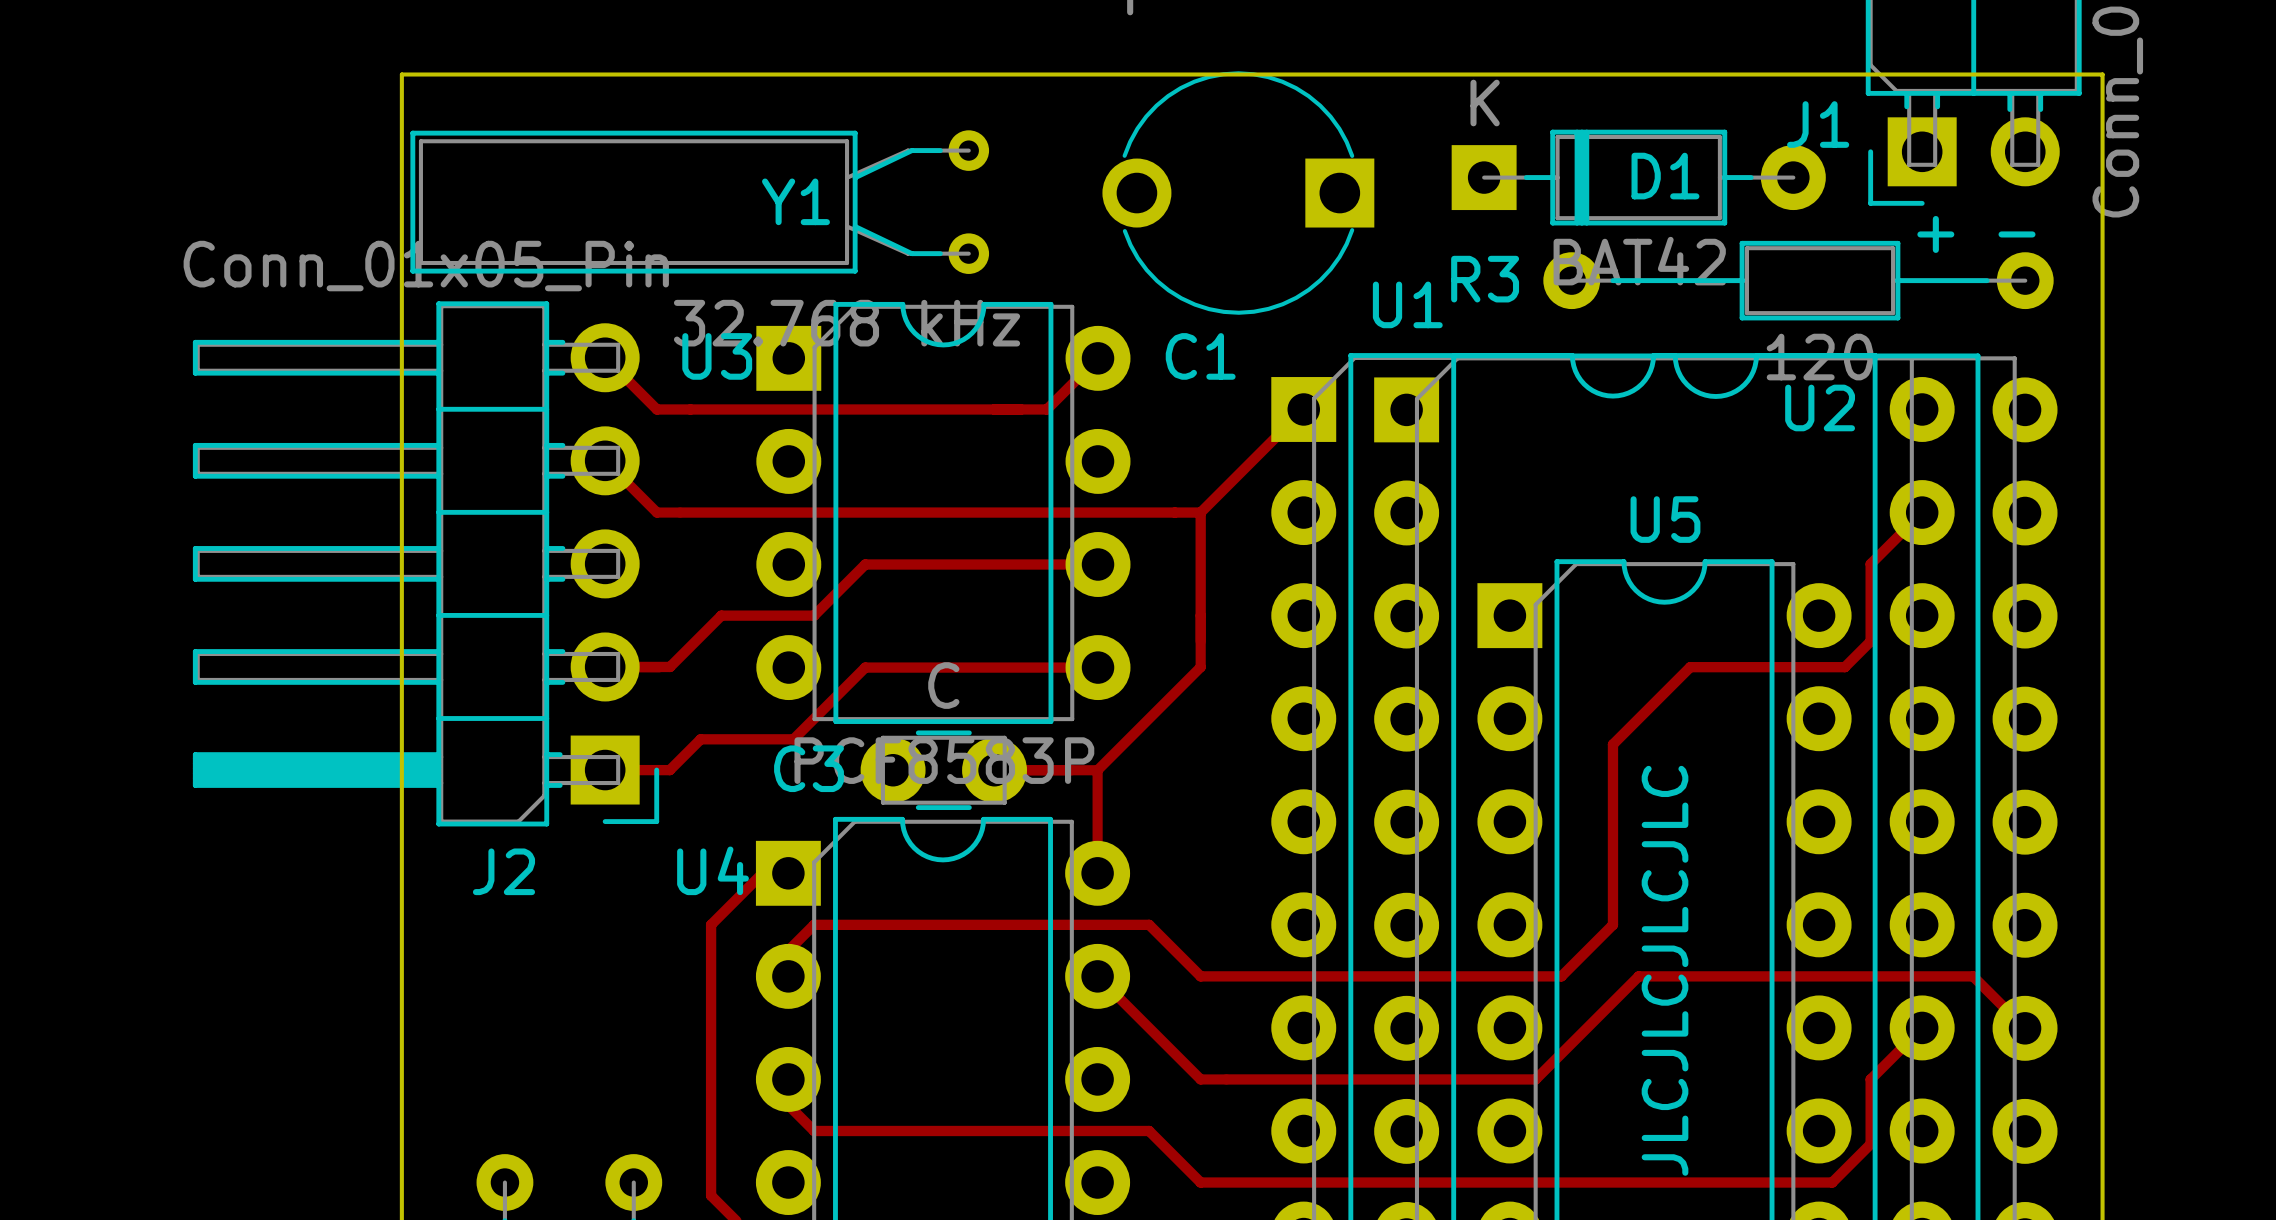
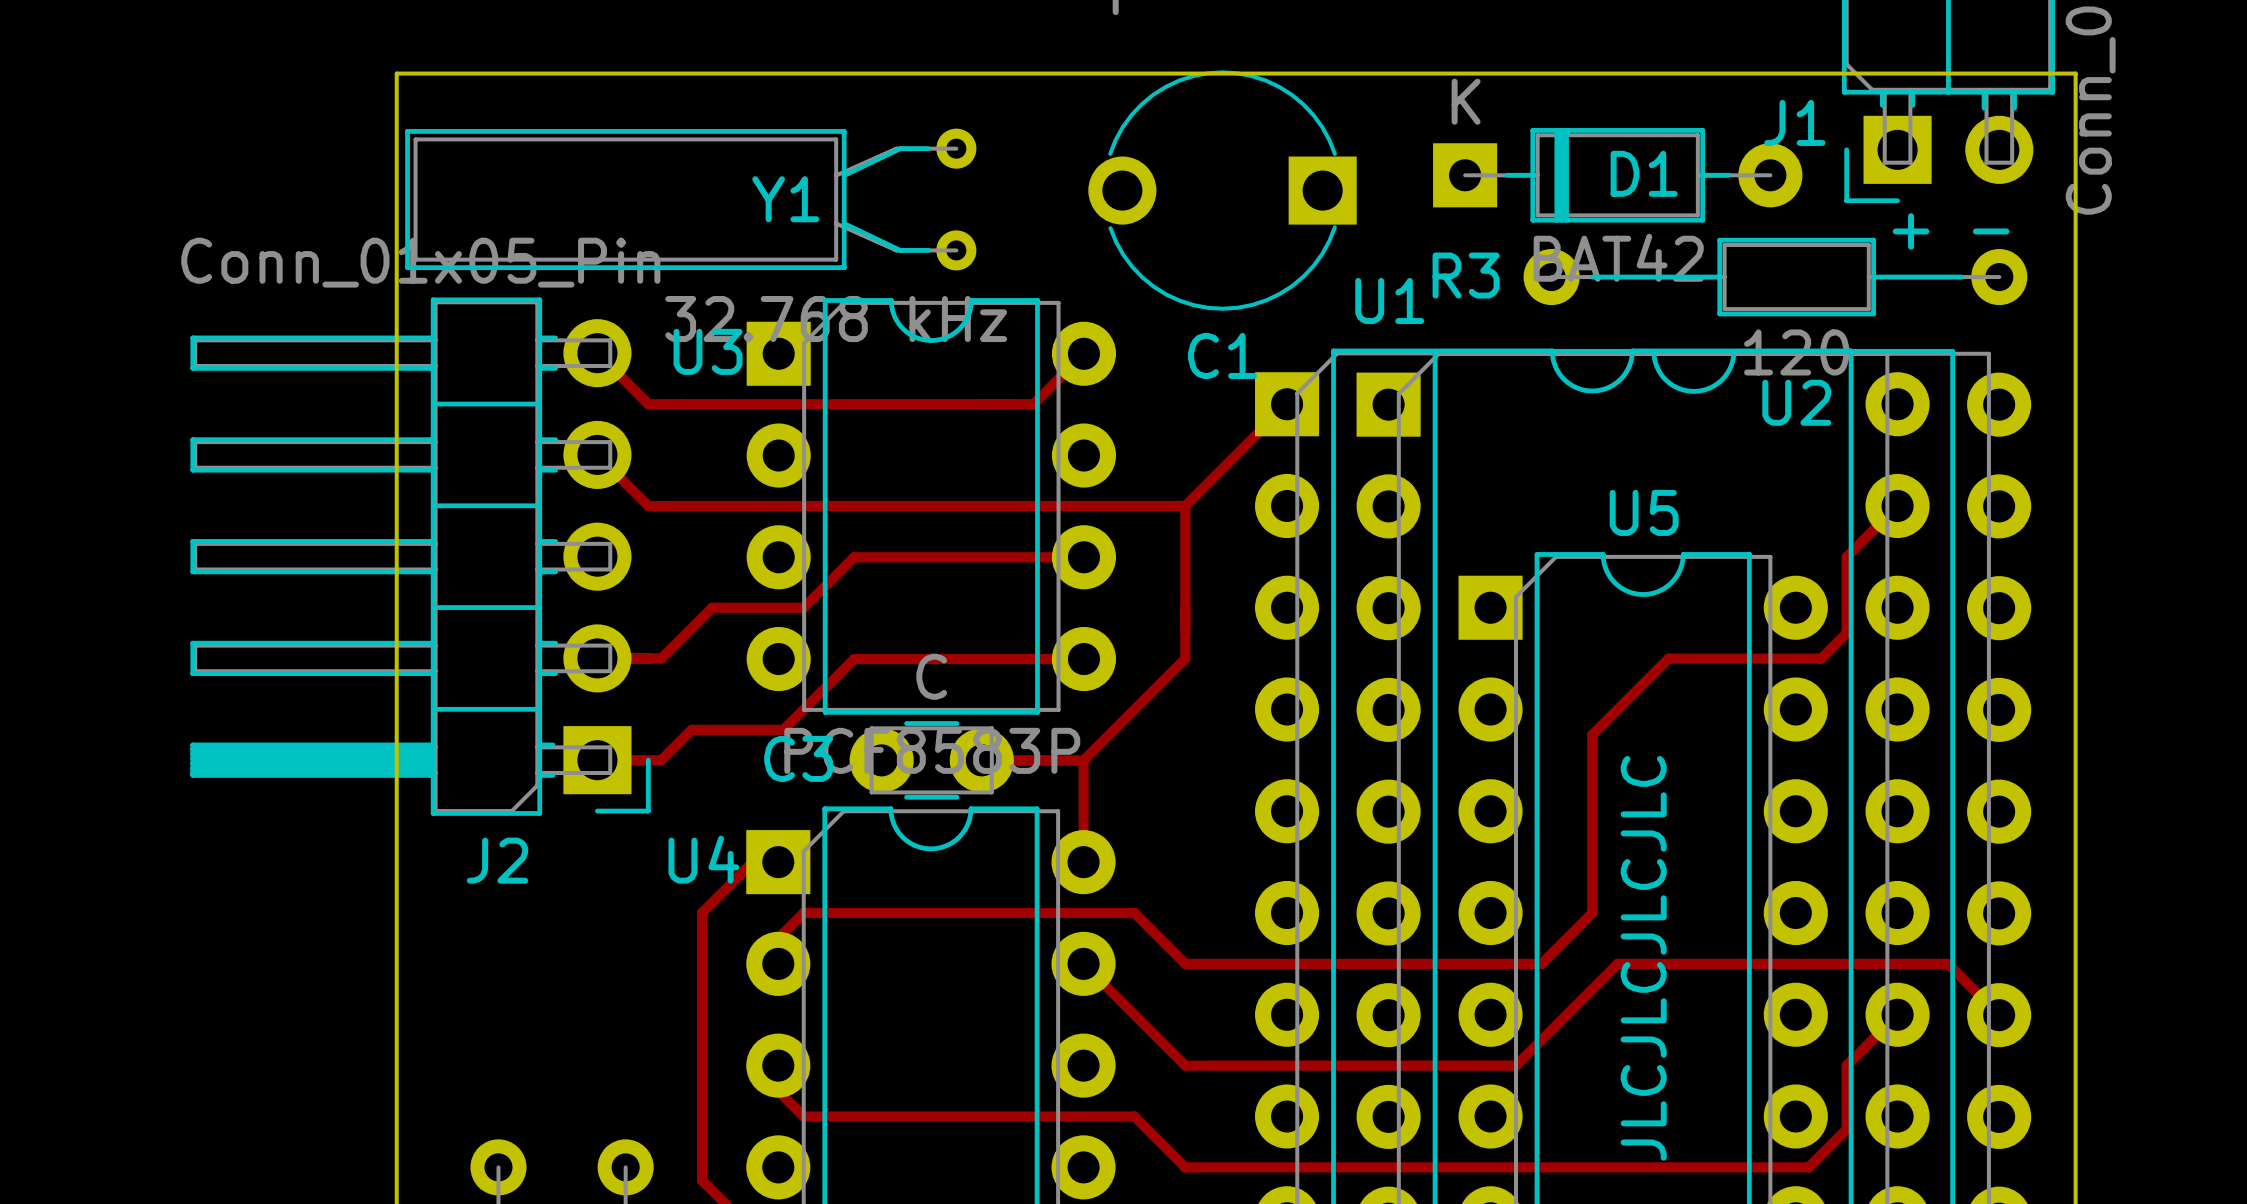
C1 name position: C1 (1200, 356) -> C1 (1222, 355)

